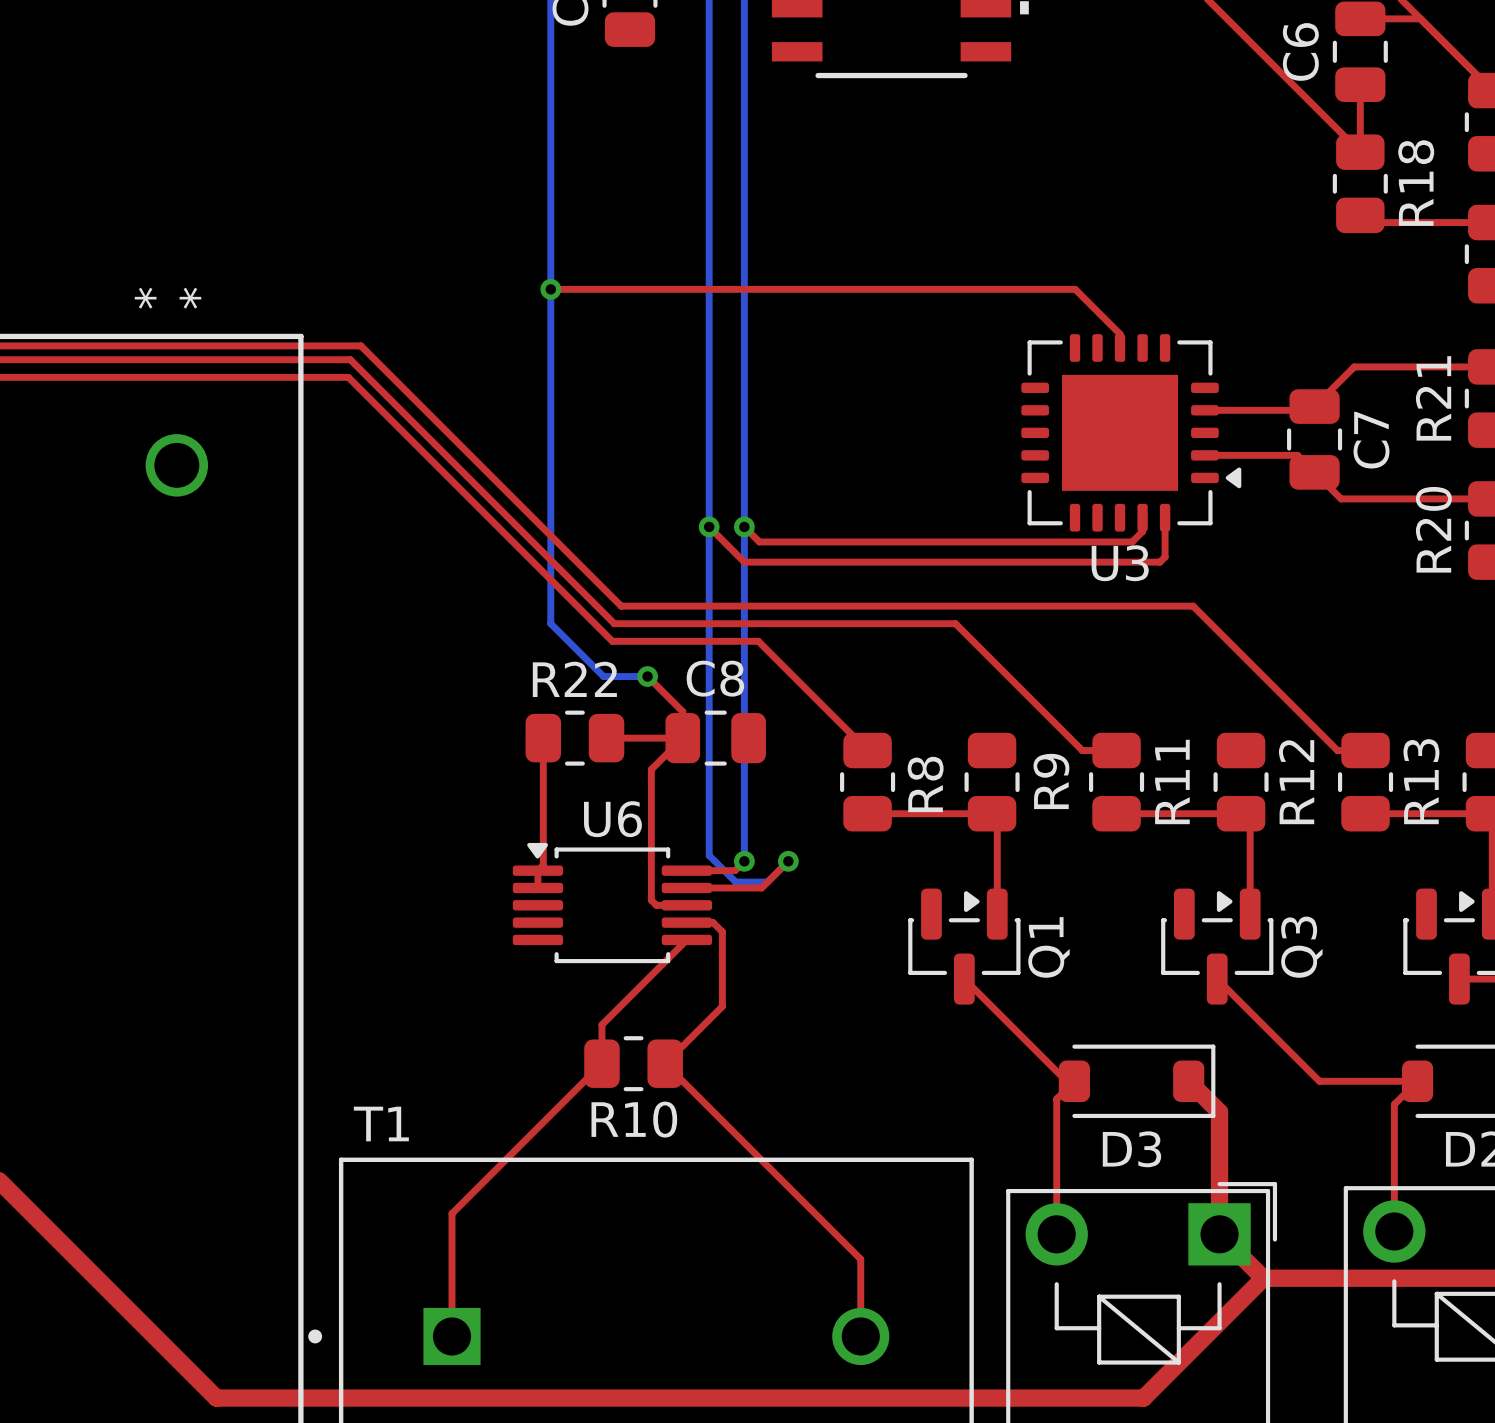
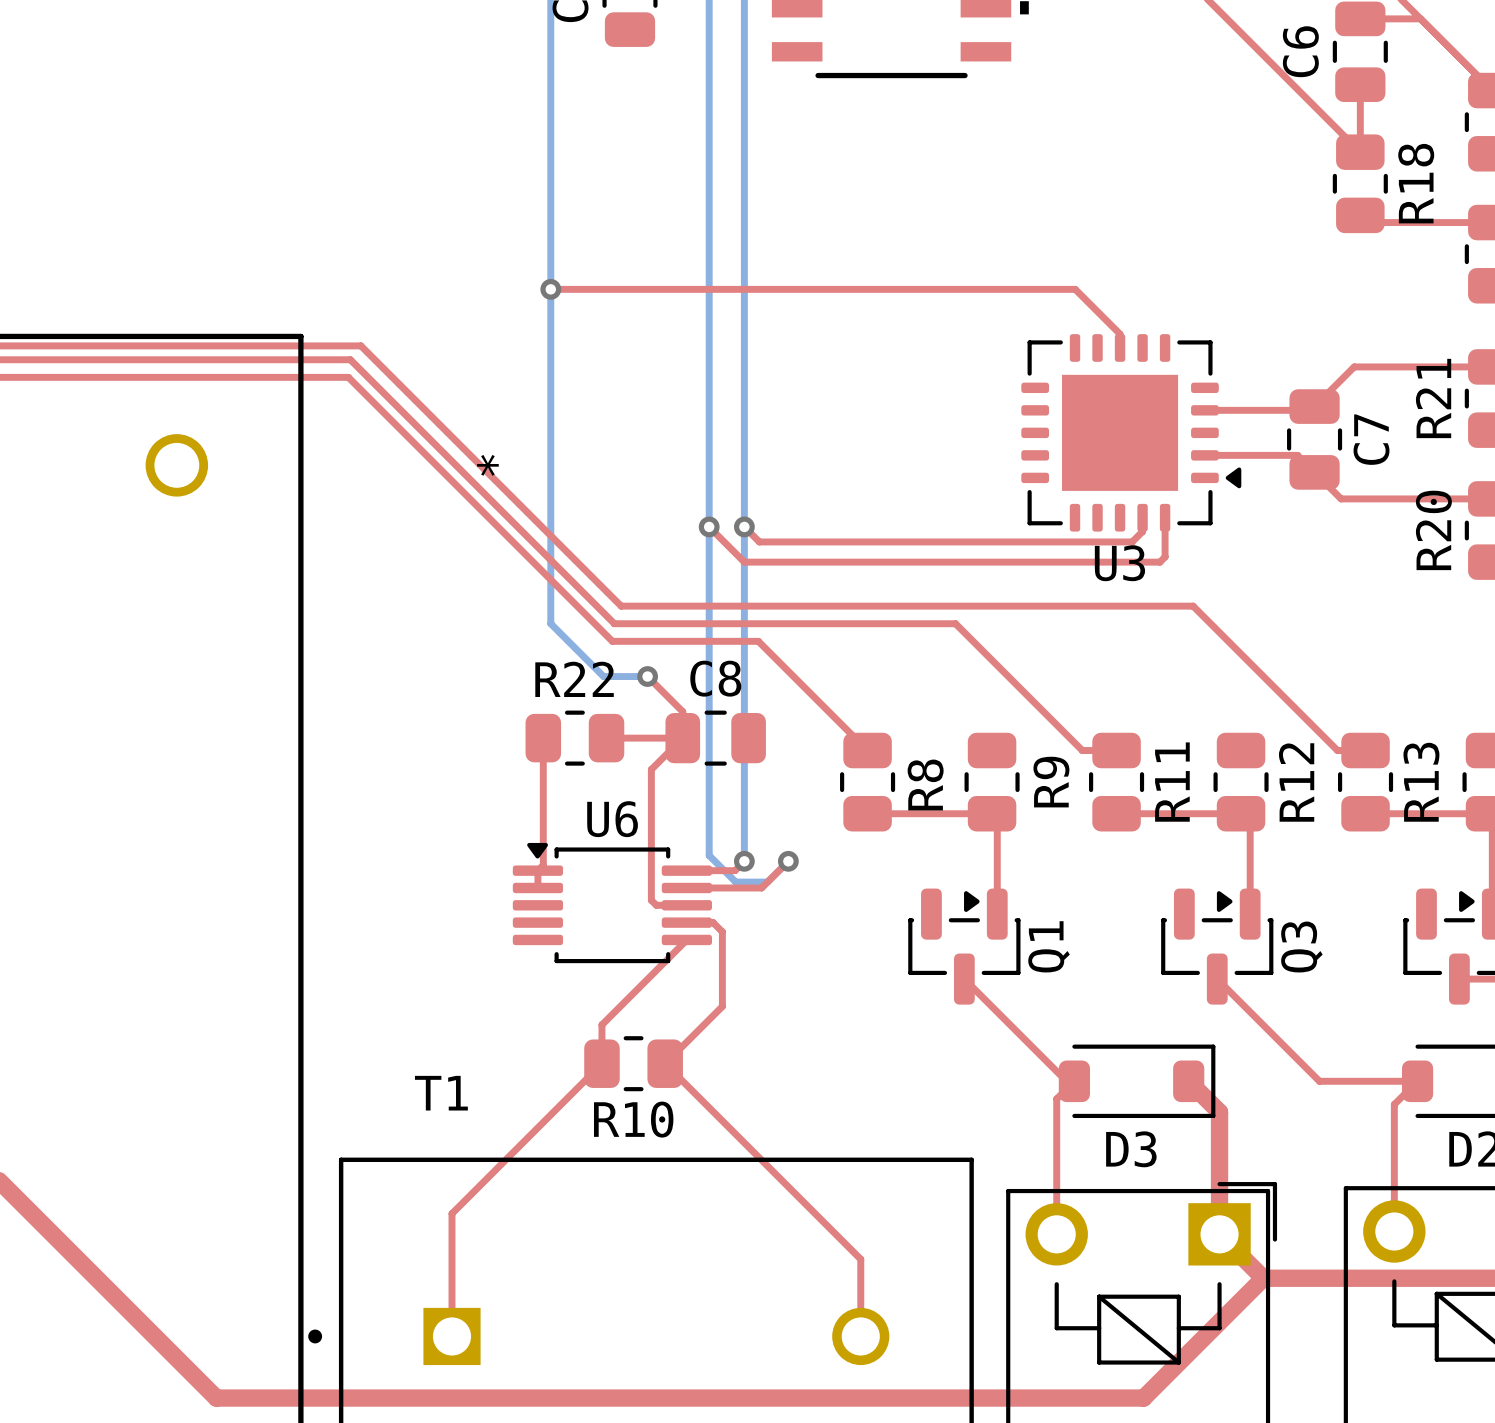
part text position: * (145, 298) -> * (487, 465)
part text: * (190, 298) -> none
T1 name position: T1 (381, 1123) -> T1 (441, 1093)

